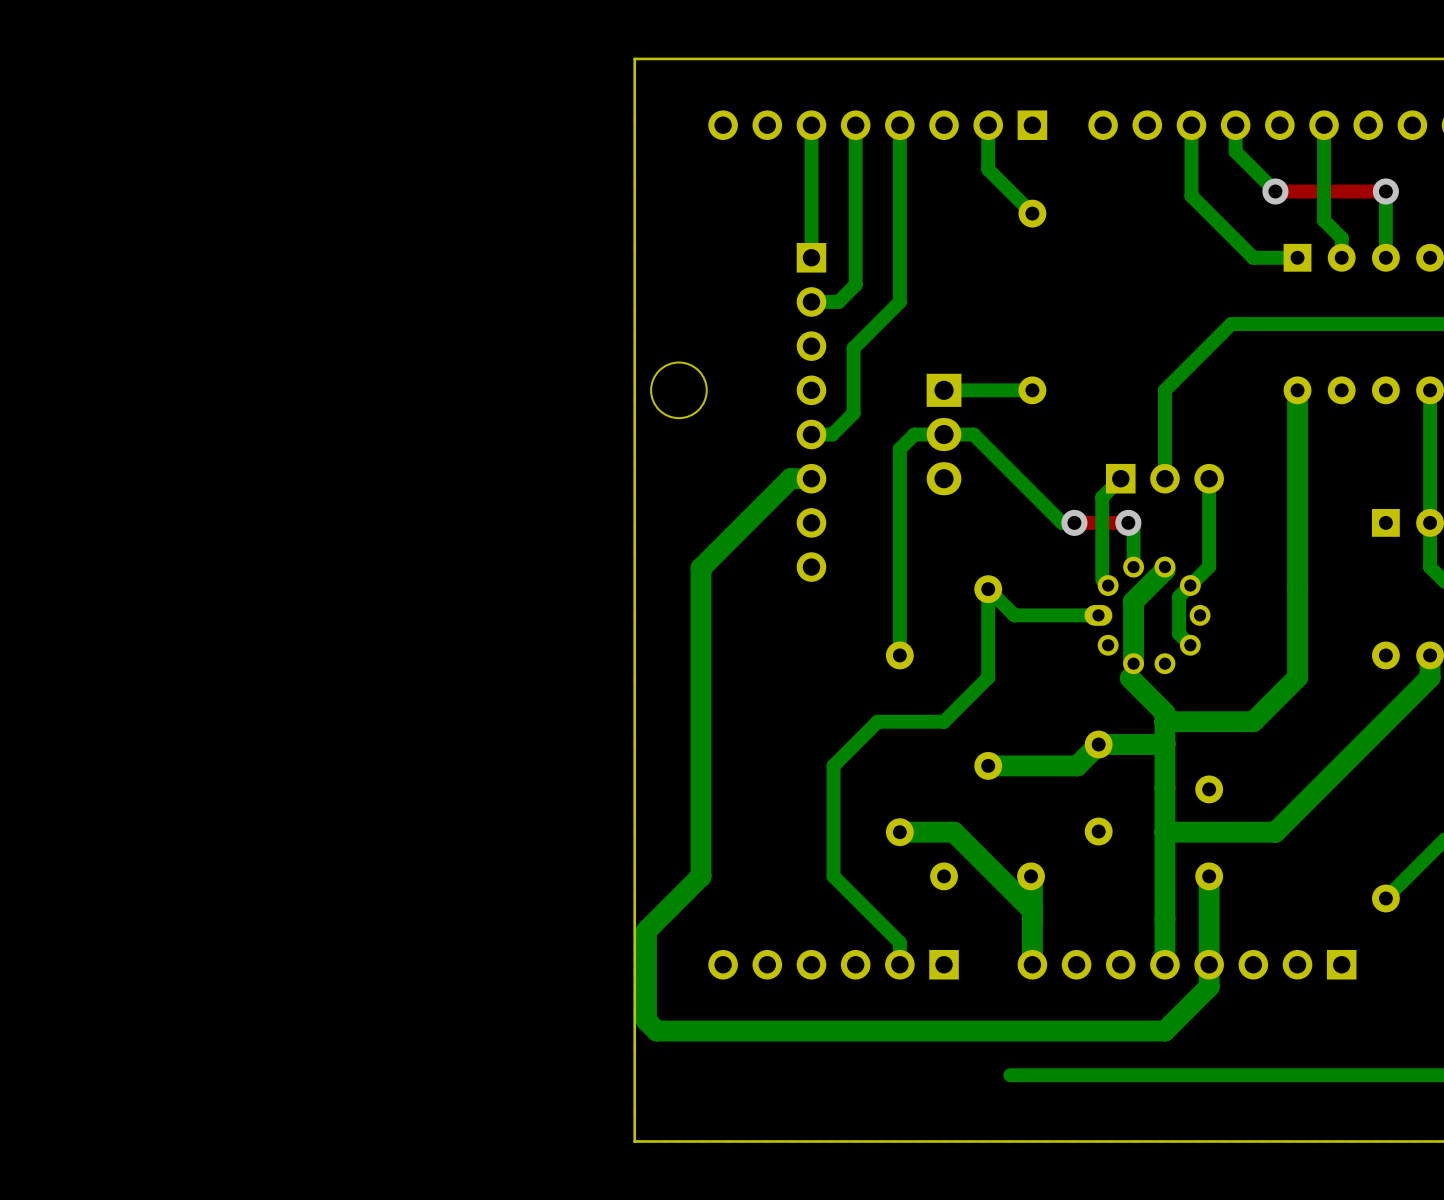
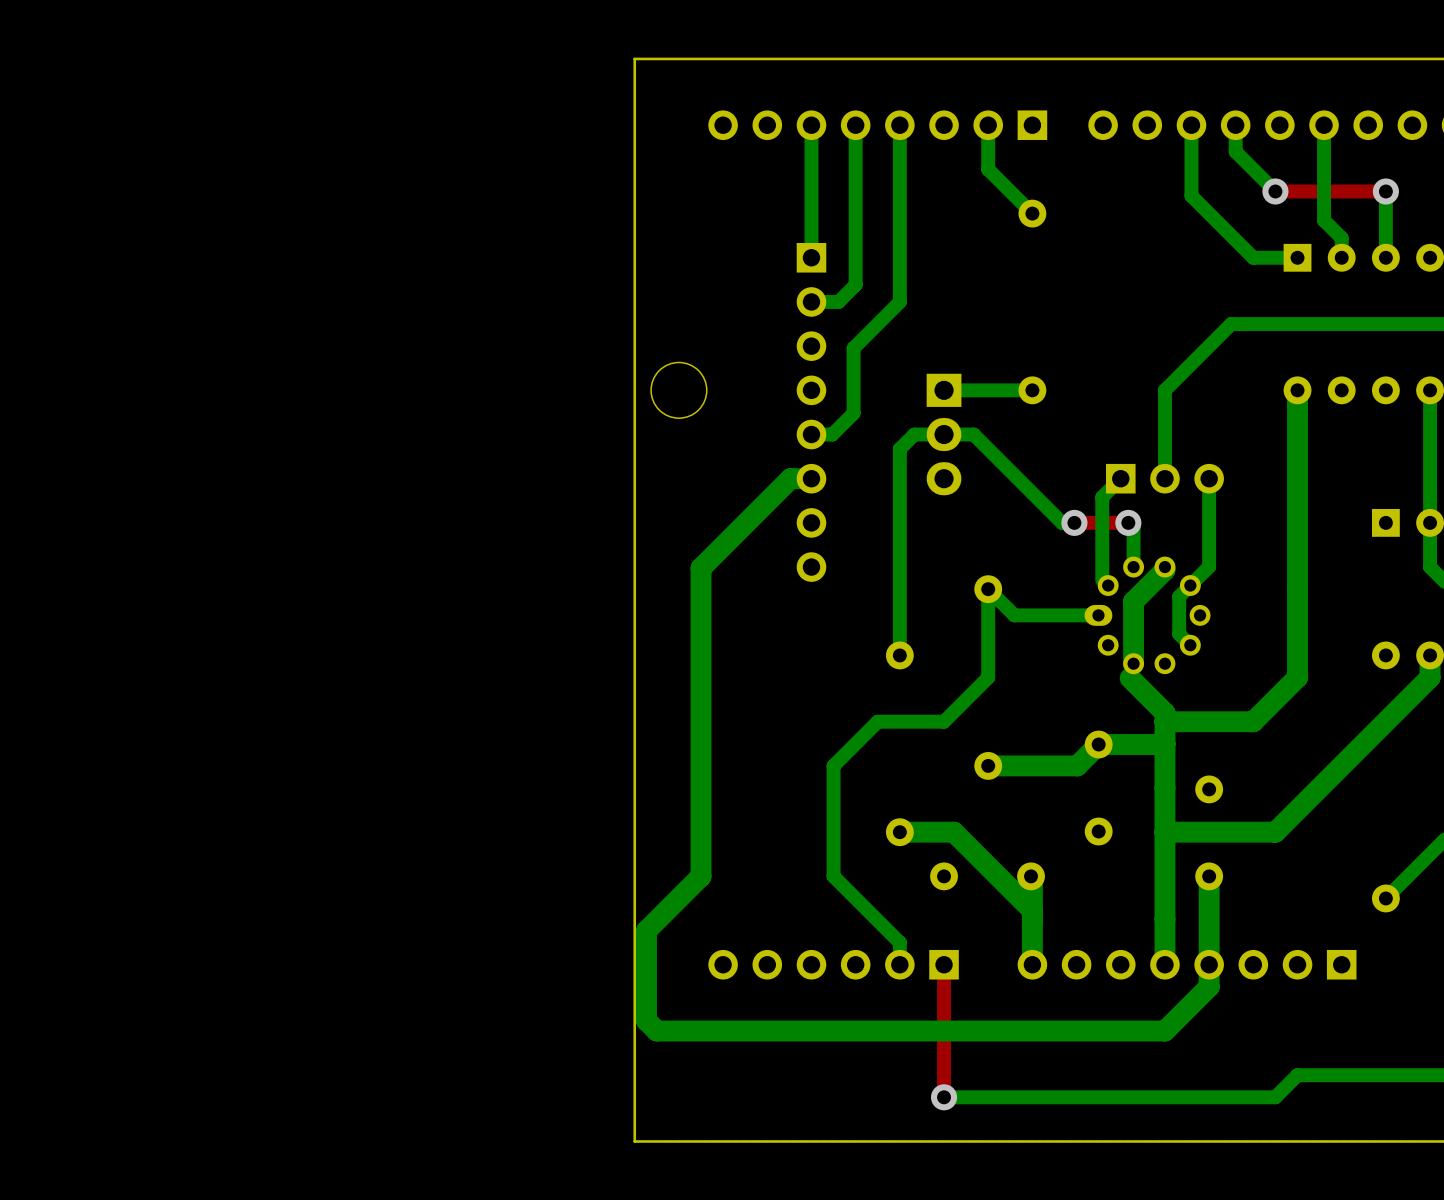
top track: none -> (944, 964) (944, 1097)
bottom track: (1297, 1075) (1010, 1075) -> (1297, 1075) (1275, 1097) (944, 1097)
via: none -> (944, 1097)

